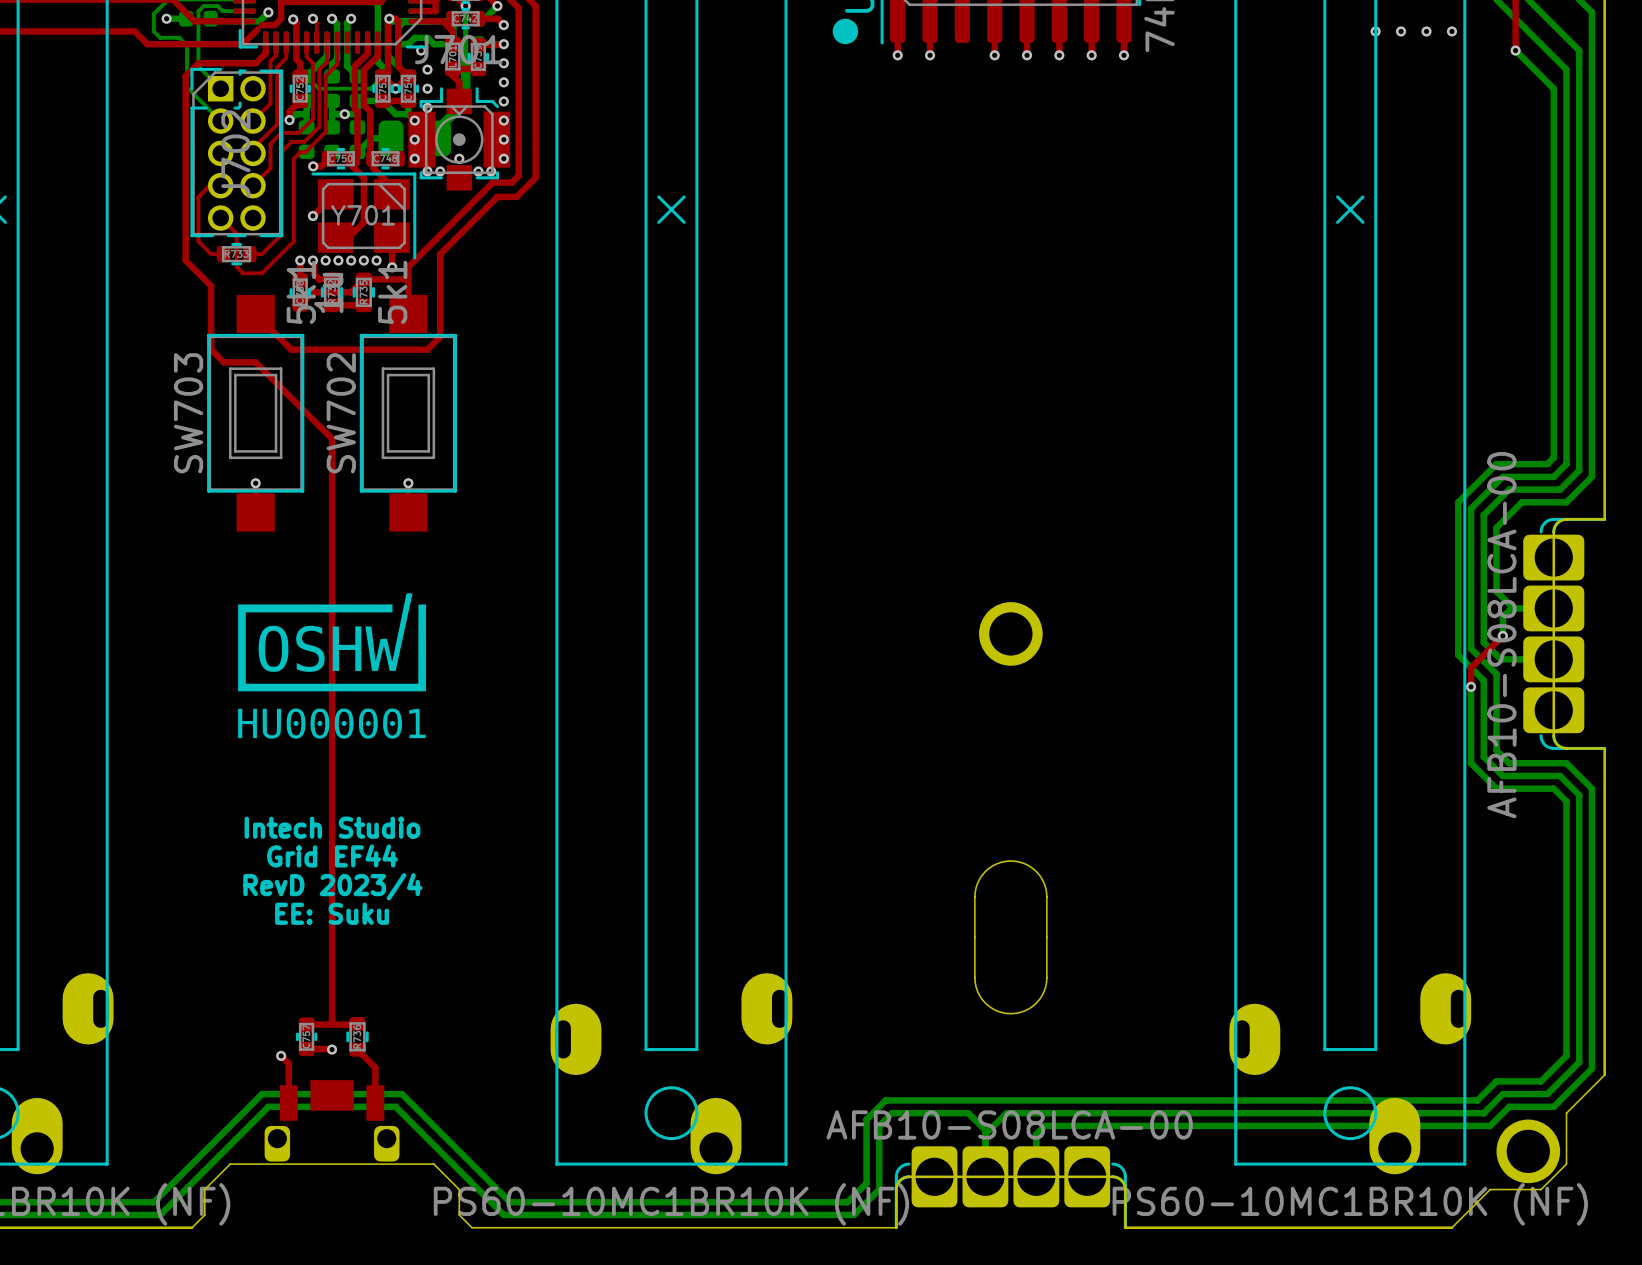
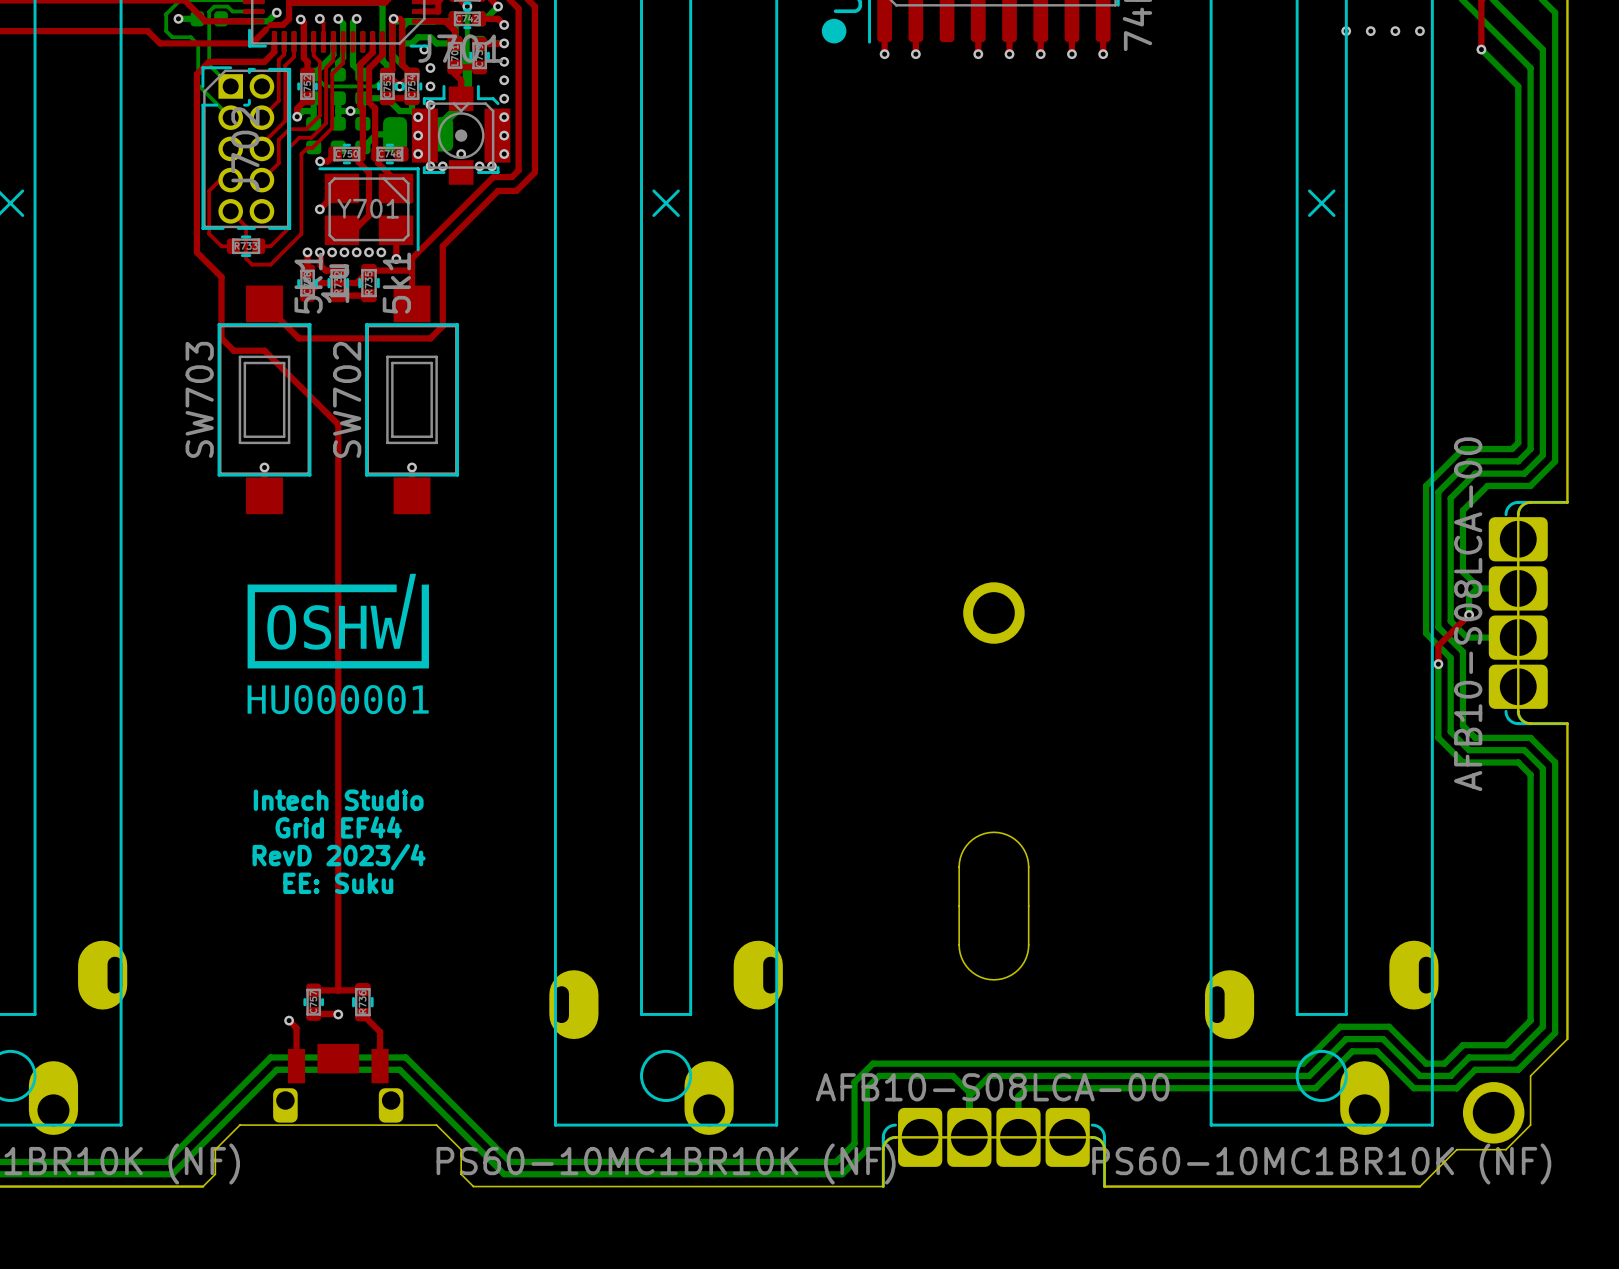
bottom track: (1331, 1100) (1458, 1100) -> (1303, 1063) (1340, 1026) (1389, 1026) (1426, 1063)
bottom track: (1337, 1113) (1451, 1113) -> (1309, 1075) (1346, 1039) (1383, 1039) (1419, 1075)
bottom track: (1343, 1125) (1445, 1125) -> (1315, 1088) (1352, 1051) (1376, 1051) (1413, 1088)

